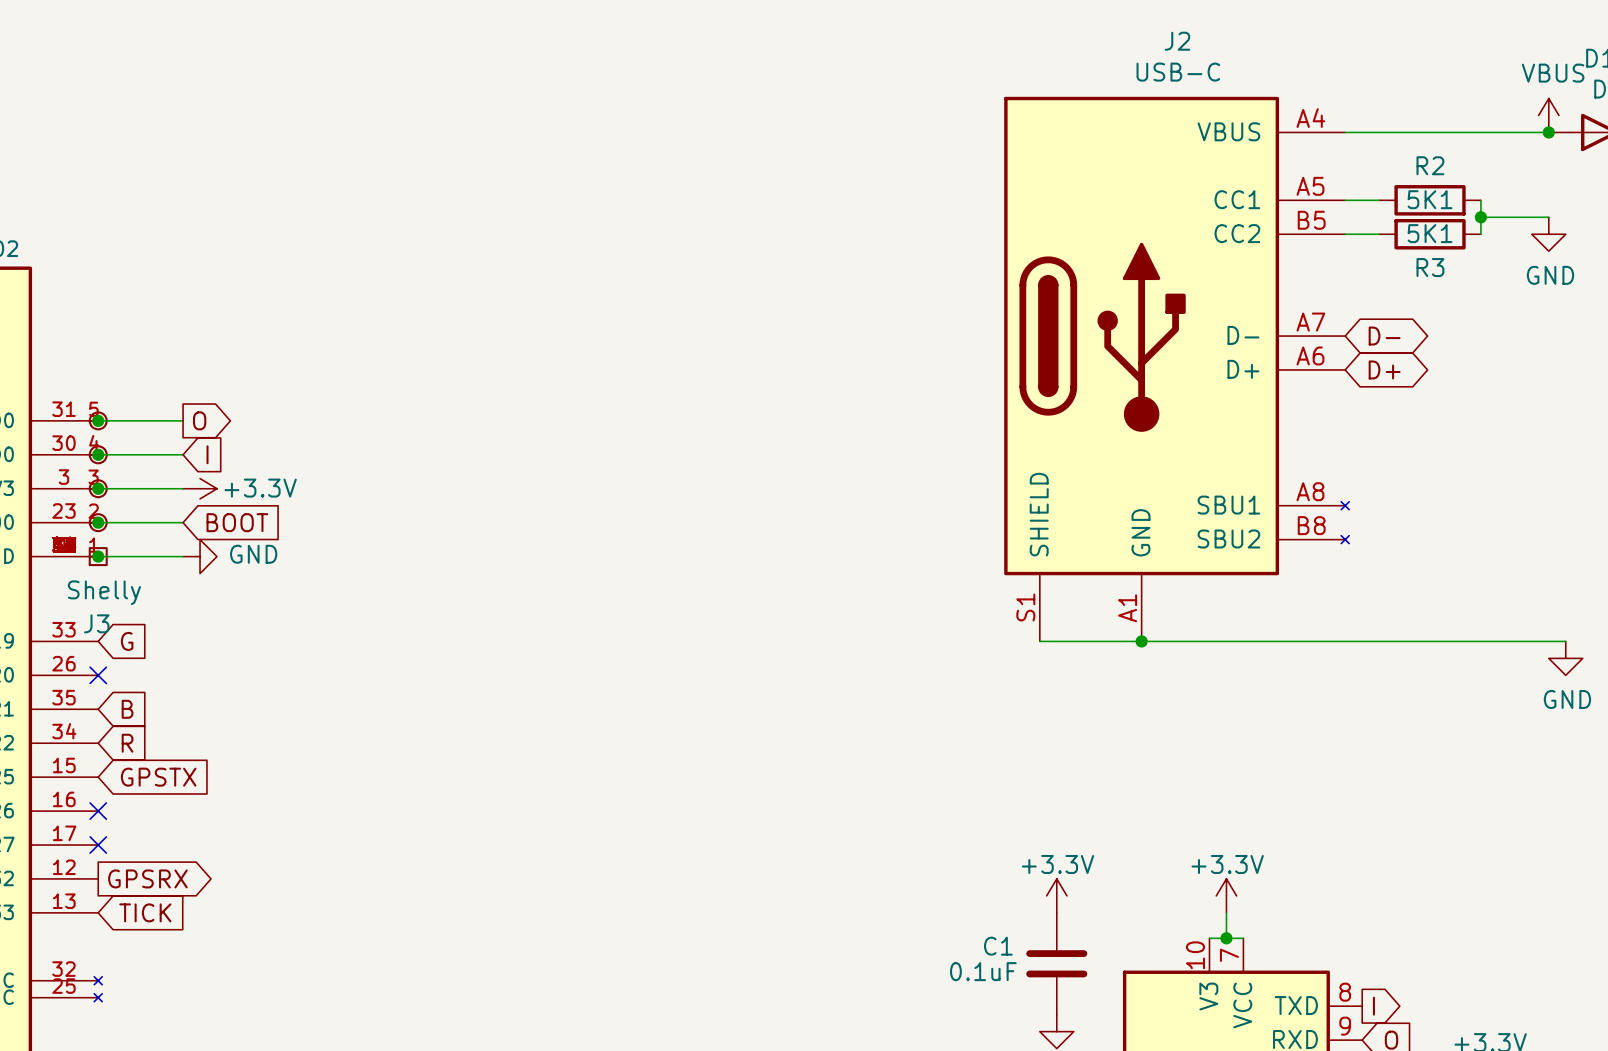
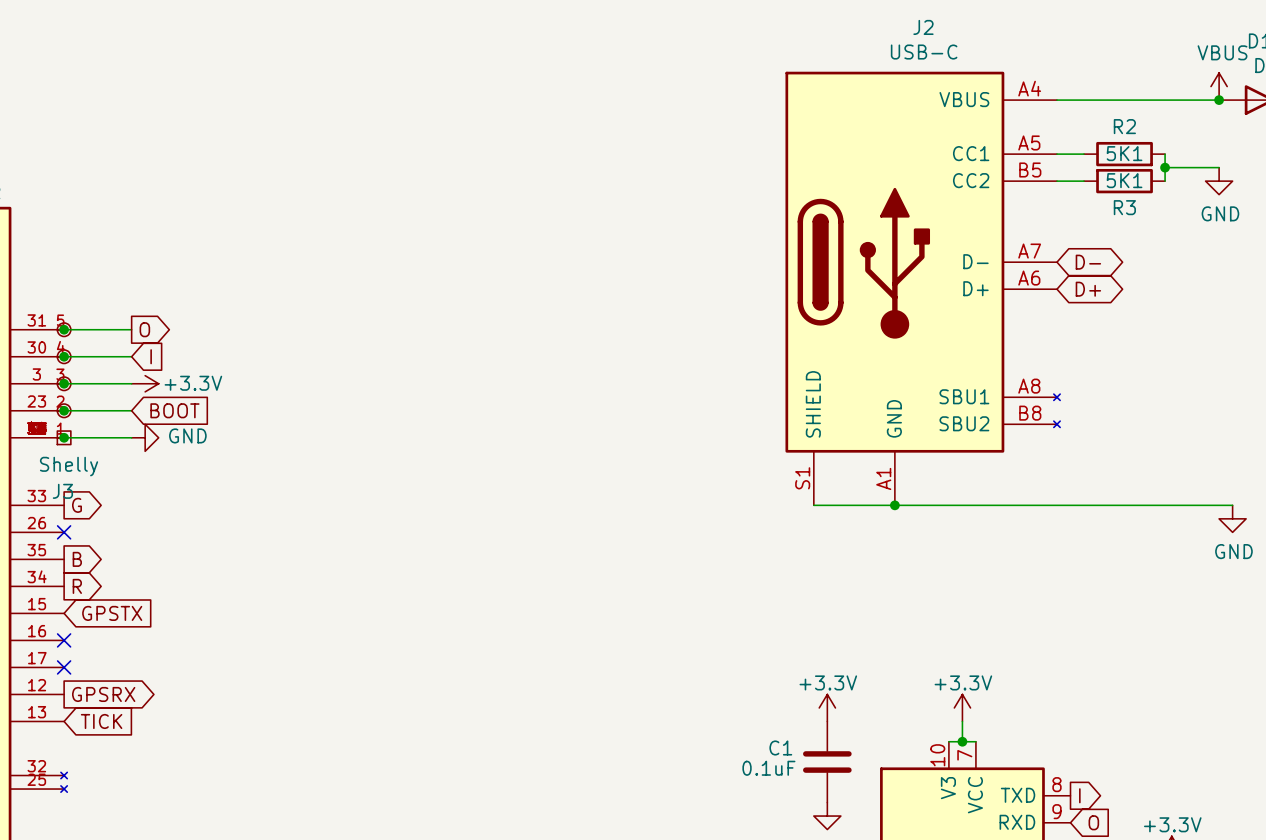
global label shape: input (127, 641) -> output (76, 505)
global label shape: input (127, 709) -> output (77, 559)
global label shape: input (127, 743) -> output (77, 586)

